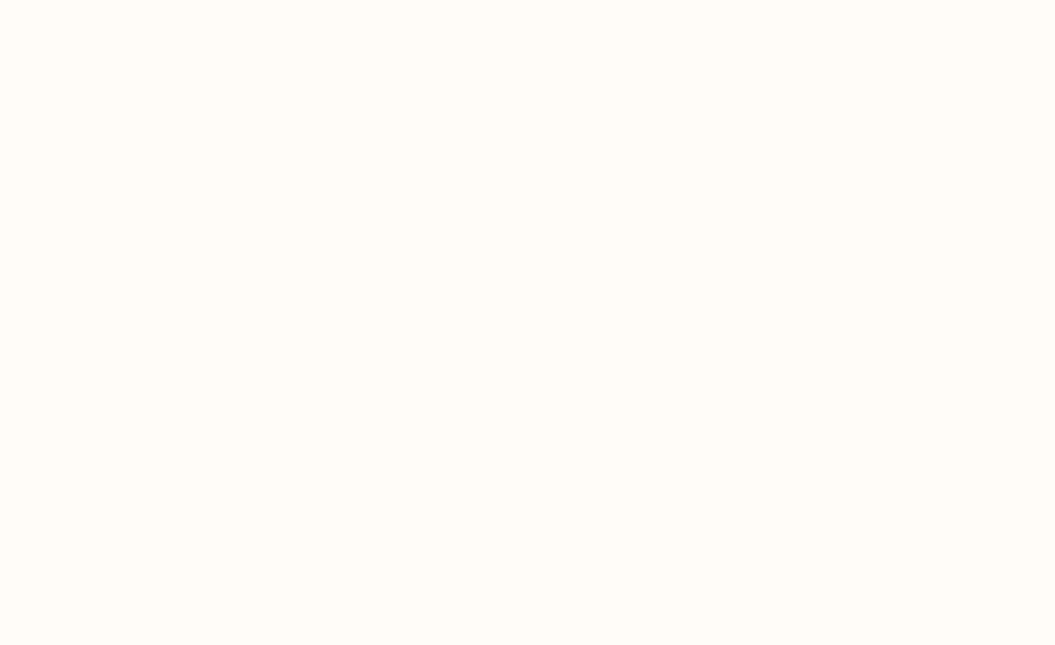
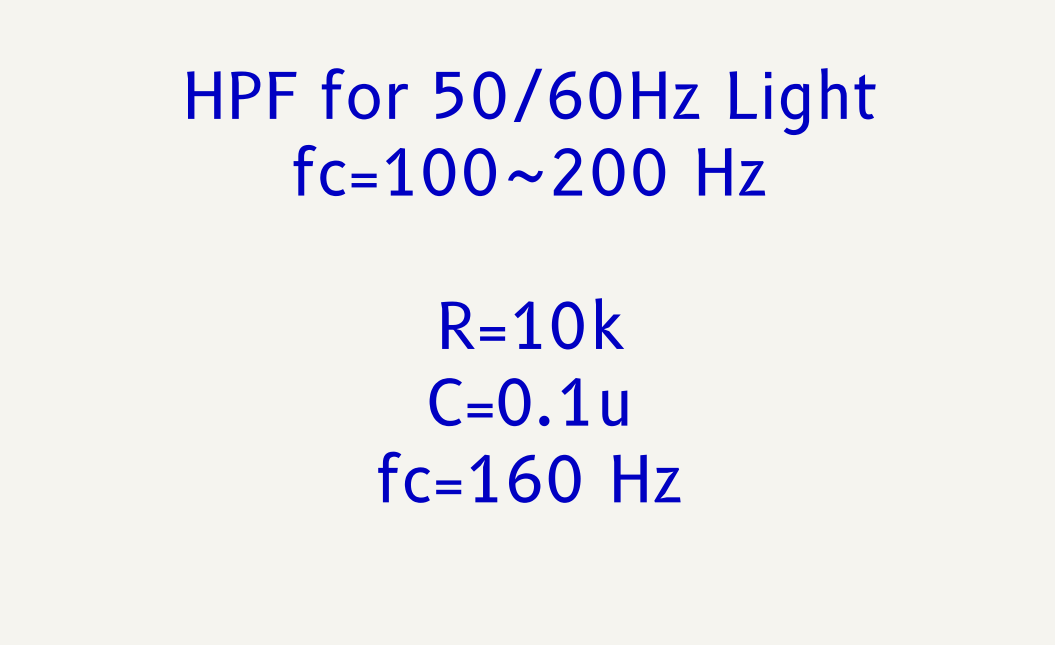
text: none -> HPF for 50/60Hz Light (531, 101)
text: none -> fc=100~200 Hz (529, 170)
text: none -> R=10k (532, 323)
text: none -> C=0.1u (528, 402)
text: none -> fc=160 Hz (529, 477)

